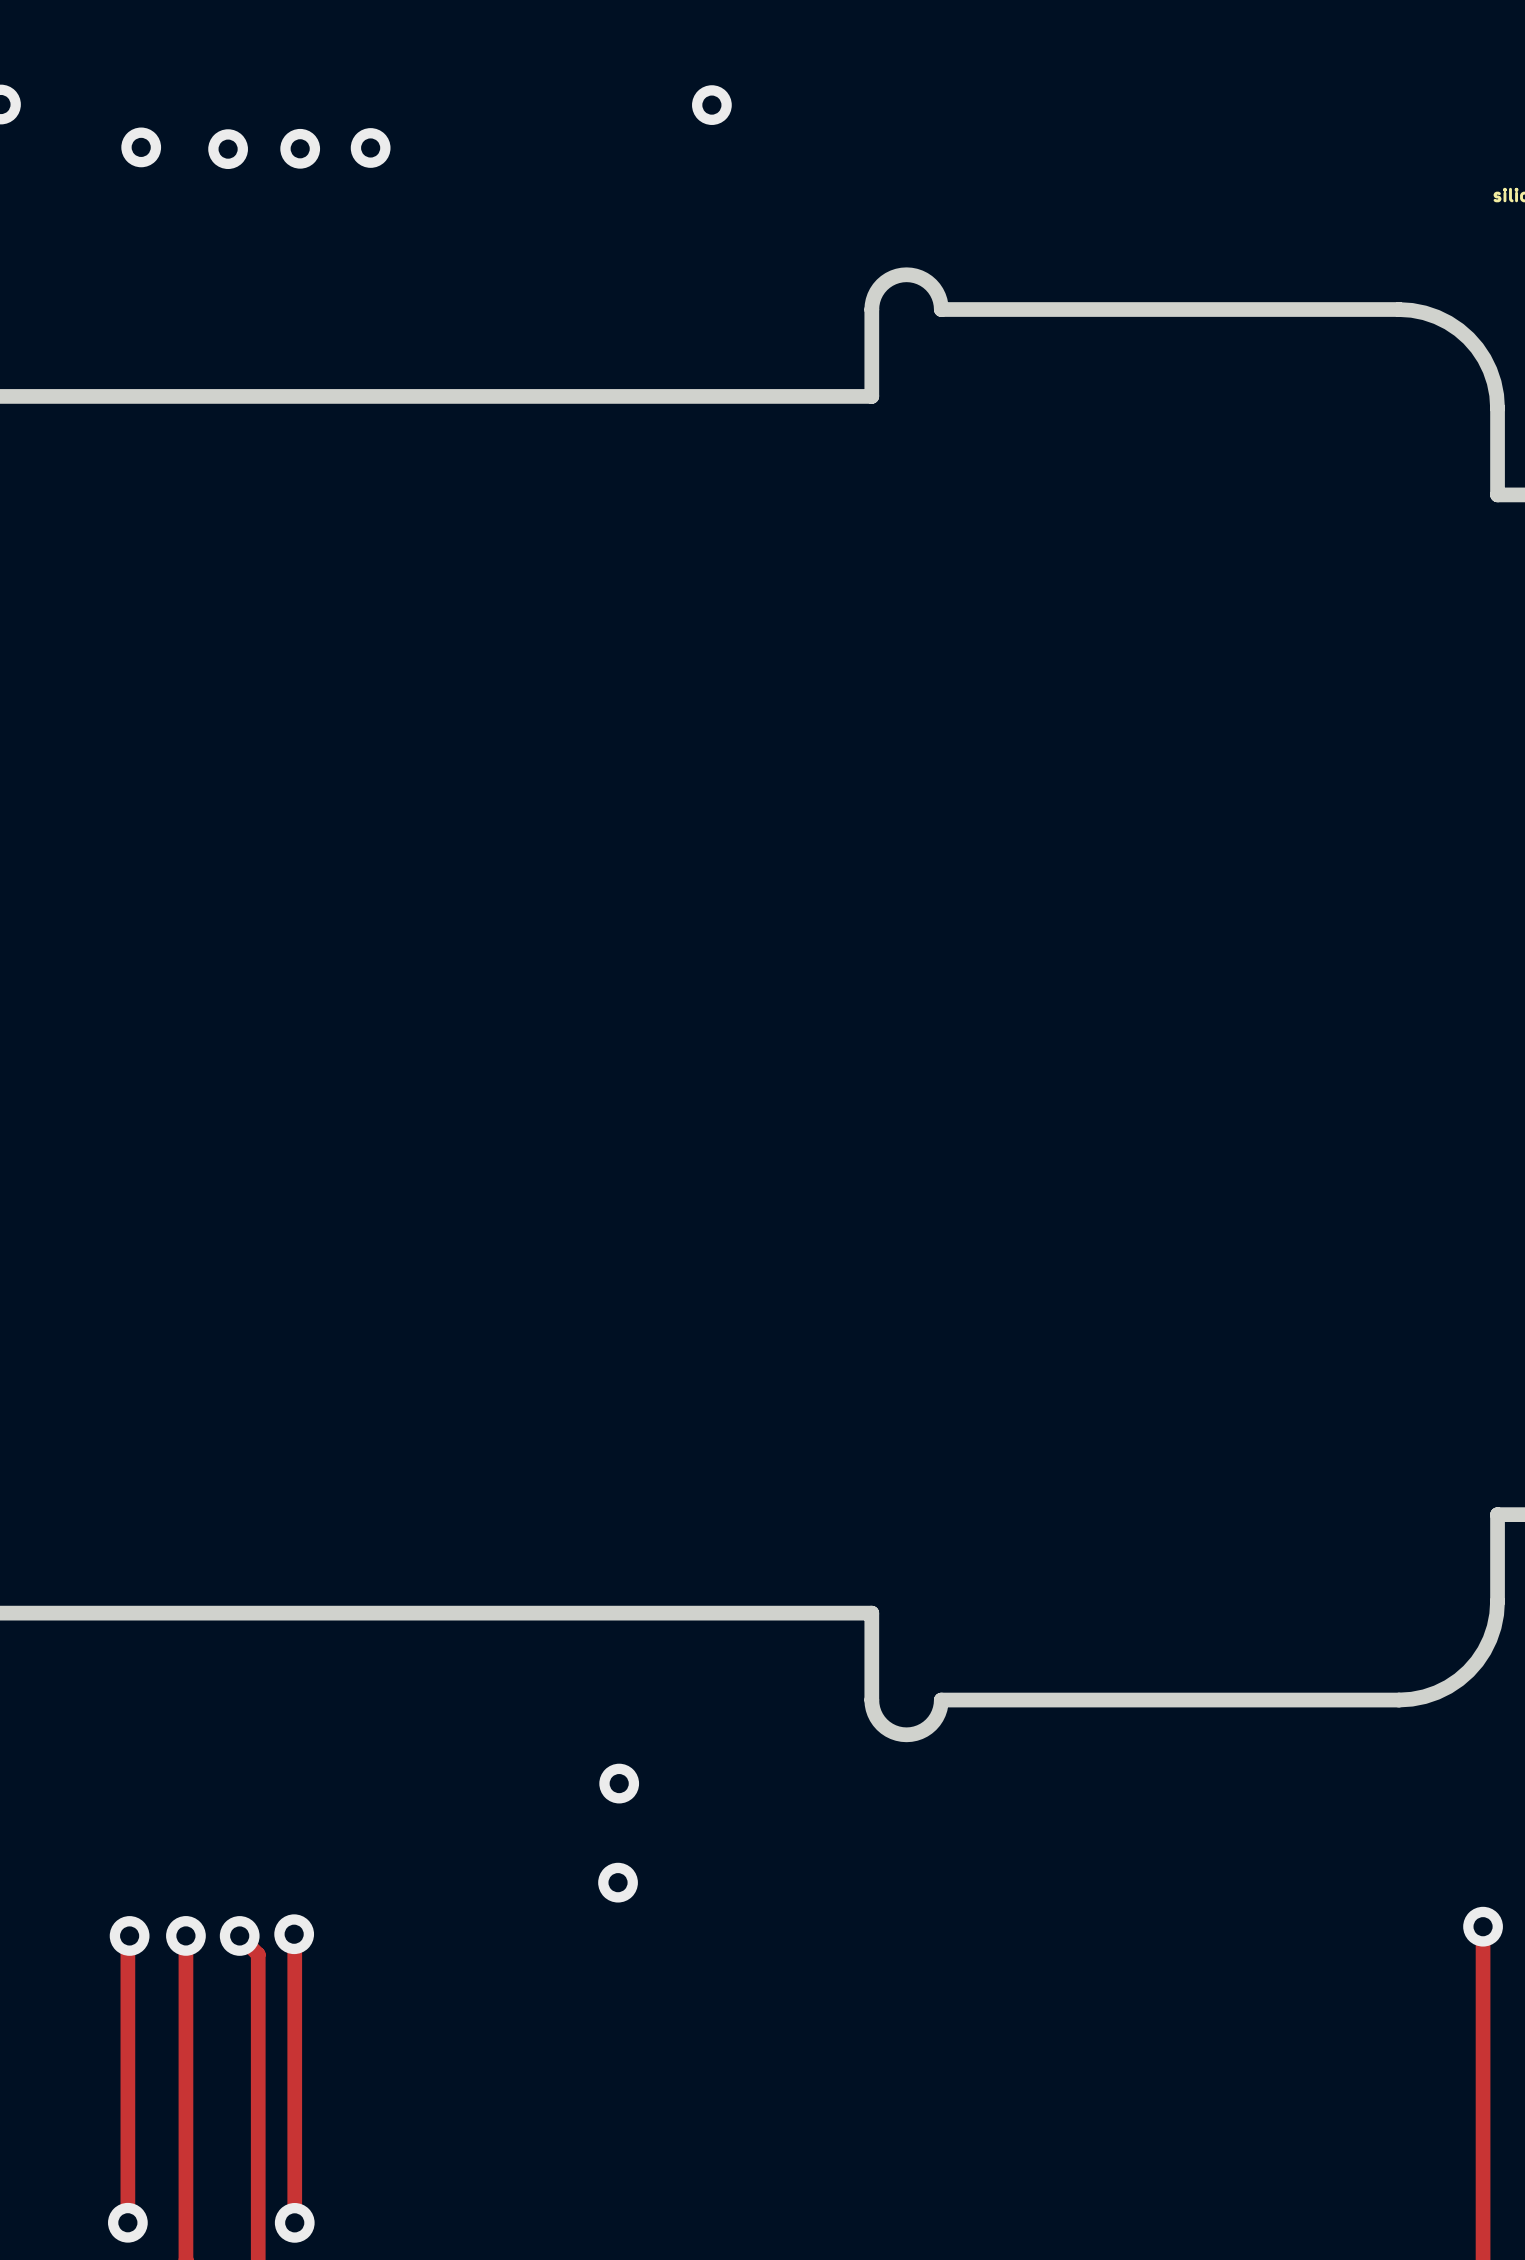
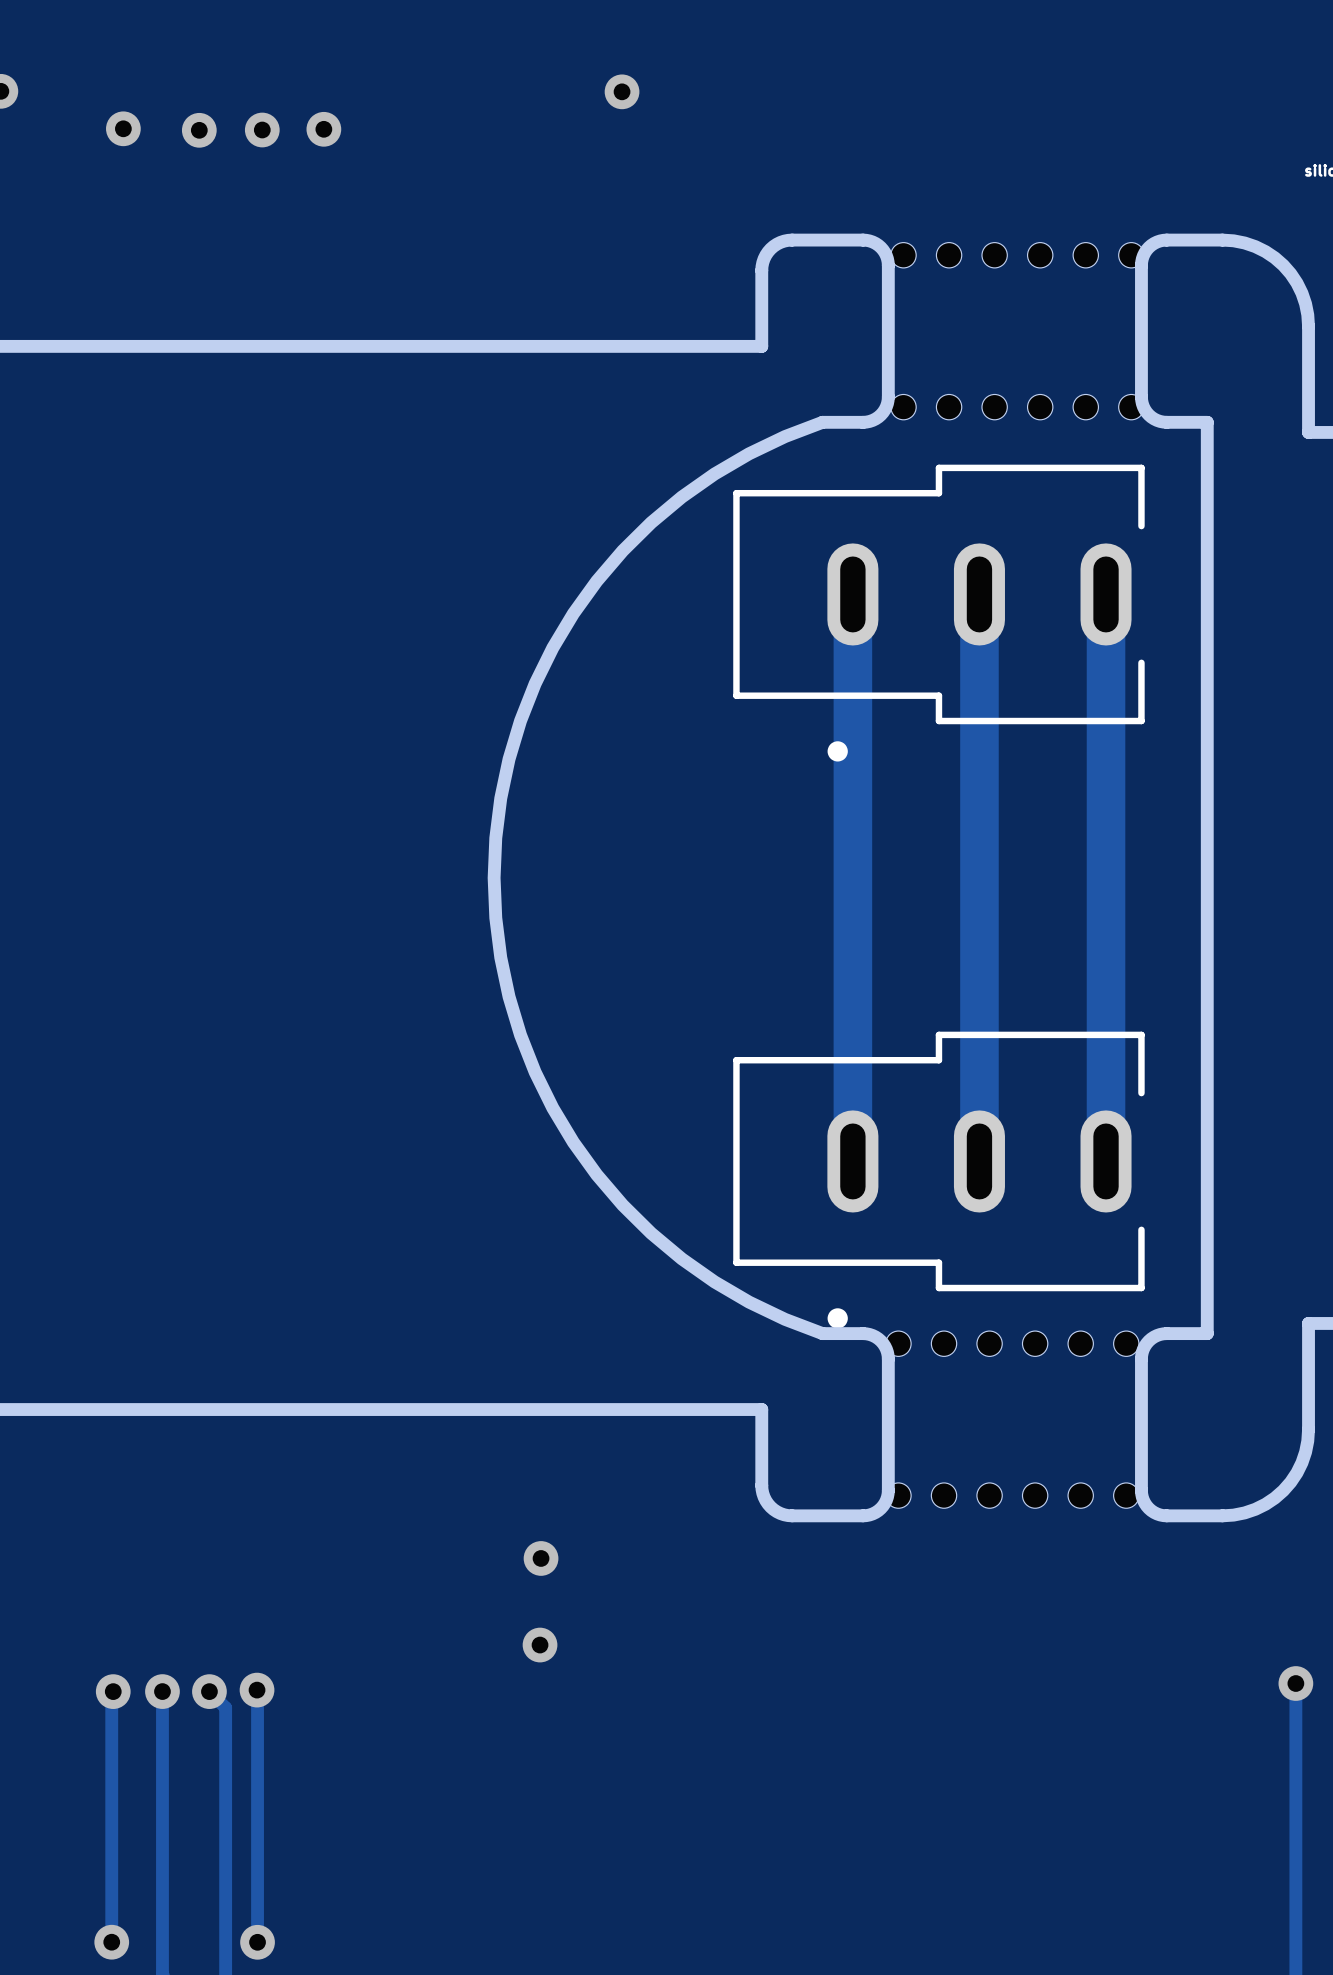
part: none -> (1017, 255)
board edge: (871, 309) (874, 296) (881, 284) (893, 277) (906, 274) (919, 277) (931, 284) (938, 296) (941, 309) (1411, 310) (1424, 312) (1448, 322) (1468, 338) (1484, 358) (1490, 370) (1494, 382) (1497, 408) -> (761, 270) (764, 258) (768, 251) (776, 244) (788, 240) (866, 240) (880, 247) (886, 255) (888, 265) (888, 397) (886, 406) (878, 417) (869, 421) (822, 422) (785, 436) (749, 453) (714, 474) (681, 497) (651, 522) (622, 550) (596, 581) (573, 613) (552, 647) (535, 683) (520, 720) (509, 759) (500, 798) (495, 838) (494, 877) (495, 917) (500, 957) (509, 996) (520, 1034) (535, 1072) (552, 1108) (573, 1142) (596, 1174) (622, 1205) (651, 1233) (681, 1258) (714, 1281) (749, 1302) (785, 1319) (822, 1333) (869, 1334) (878, 1338) (886, 1349) (888, 1358) (888, 1490) (886, 1500) (880, 1508) (866, 1515) (788, 1515) (776, 1511) (768, 1503) (764, 1497) (761, 1485)
part: none -> (1017, 407)
track: none -> (979, 589) (979, 1151)
track: none -> (1106, 589) (1106, 1151)
track: none -> (852, 594) (852, 1156)
part: none -> (938, 613)
part: none -> (938, 1180)
part: none -> (1012, 1343)
board edge: (1497, 1601) (1494, 1627) (1490, 1639) (1484, 1650) (1468, 1671) (1448, 1686) (1424, 1696) (1411, 1699) (941, 1700) (938, 1713) (931, 1724) (919, 1732) (906, 1734) (893, 1732) (881, 1724) (874, 1713) (871, 1700) -> (1308, 1399) (1307, 1441) (1301, 1462) (1283, 1490) (1265, 1504) (1233, 1515) (1166, 1515) (1154, 1512) (1144, 1503) (1141, 1490) (1141, 1358) (1143, 1349) (1151, 1338) (1160, 1334) (1207, 1333) (1207, 422) (1160, 421) (1151, 417) (1143, 406) (1141, 397) (1141, 265) (1144, 252) (1154, 243) (1166, 240) (1233, 240) (1265, 251) (1283, 265) (1301, 293) (1307, 314) (1308, 356)
part: none -> (1012, 1495)

